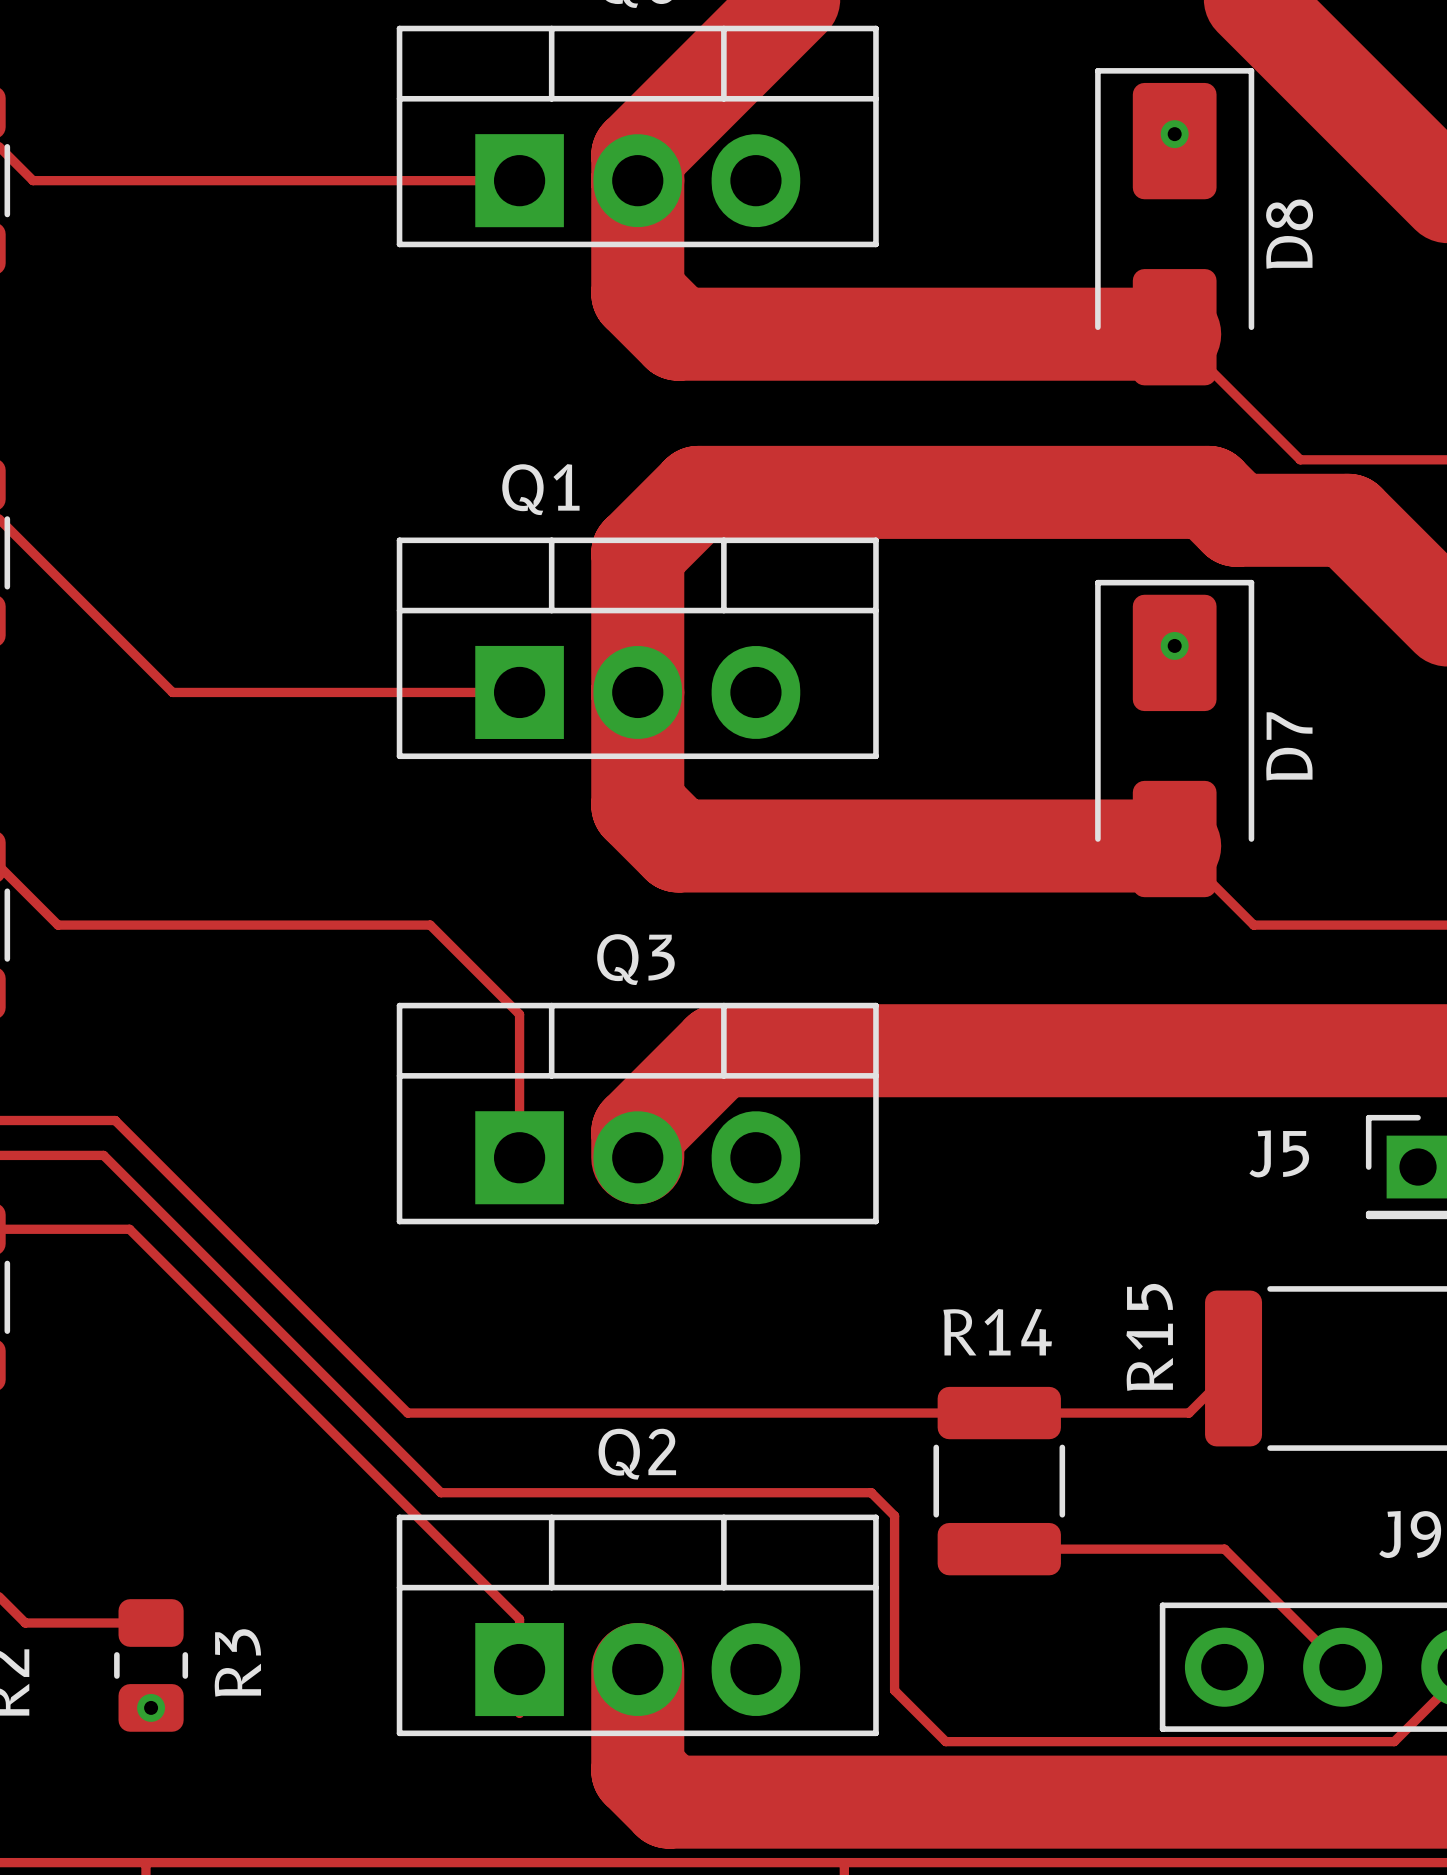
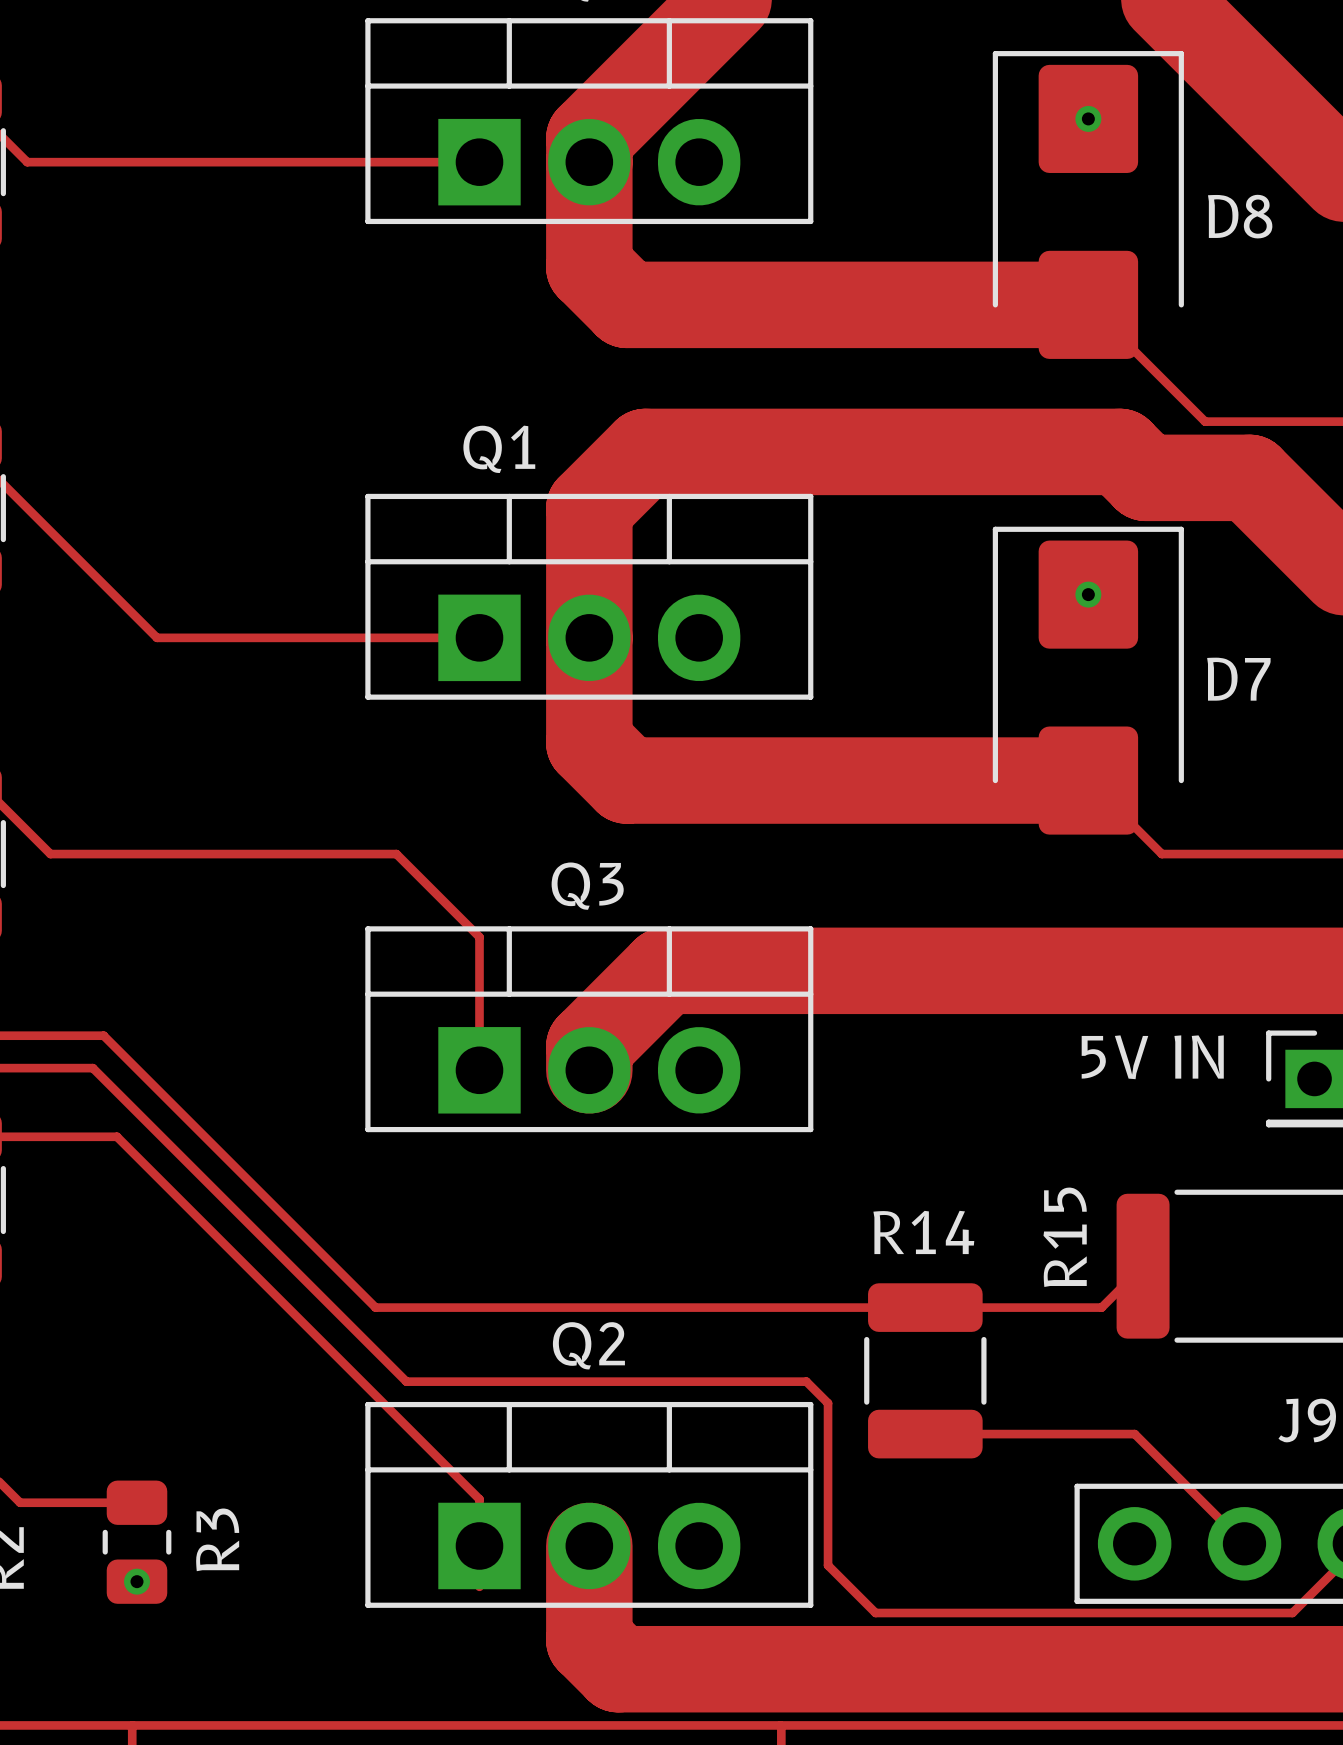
D8 footprint: [1095, 68, 1255, 386] -> [992, 51, 1184, 359]
D8 name rotation: 0° (1289, 234) -> 90° clockwise (1240, 216)
D7 footprint: [1095, 579, 1255, 898] -> [992, 526, 1184, 835]
D7 name rotation: 0° (1289, 746) -> 90° clockwise (1238, 679)
J5 name: J5 (1279, 1153) -> 5V IN (1152, 1057)

